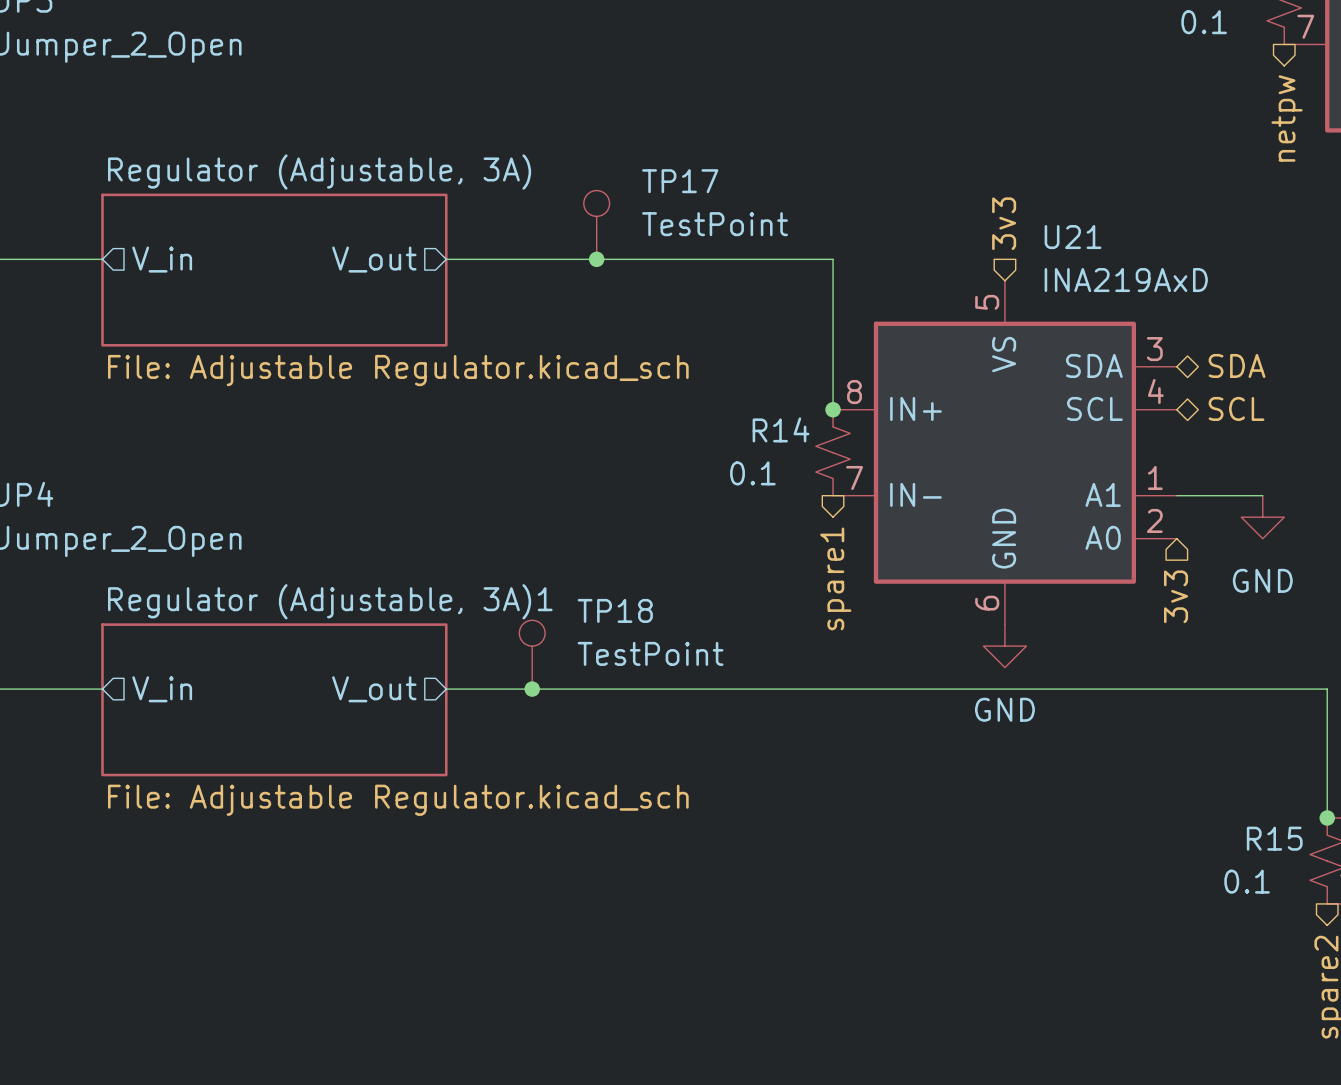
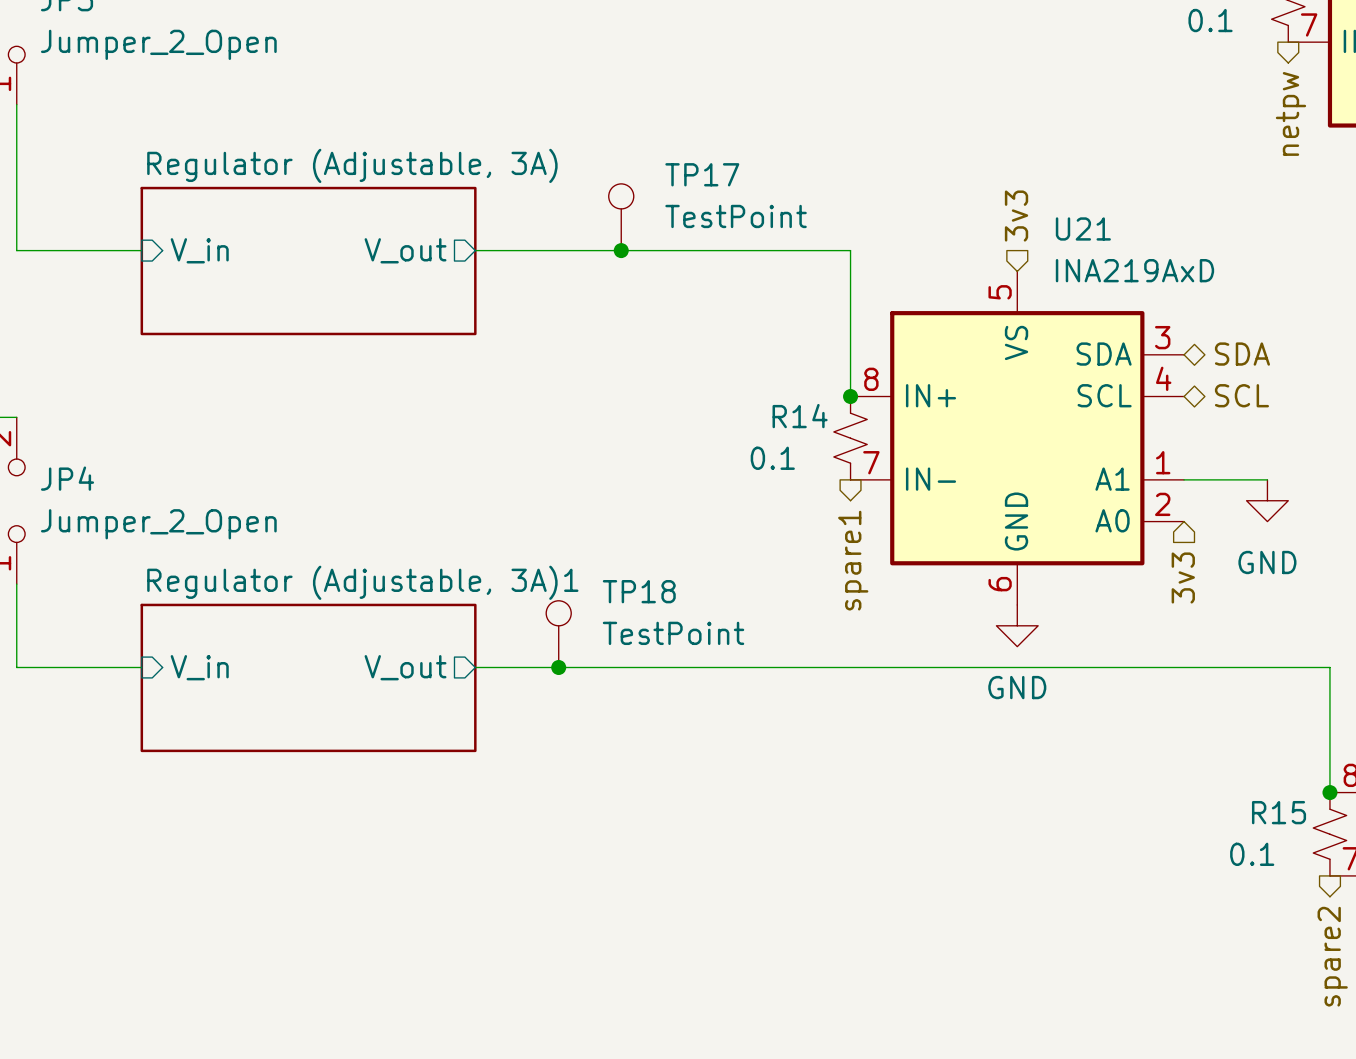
sheet pin shape: output (162, 259) -> input (199, 250)
sheet Regulator (Adjustable, 3A) value: File: Adjustable Regulator.kicad_sch (398, 370) -> none
sheet pin shape: output (162, 689) -> input (199, 667)
sheet Regulator (Adjustable, 3A)1 value: File: Adjustable Regulator.kicad_sch (398, 800) -> none

